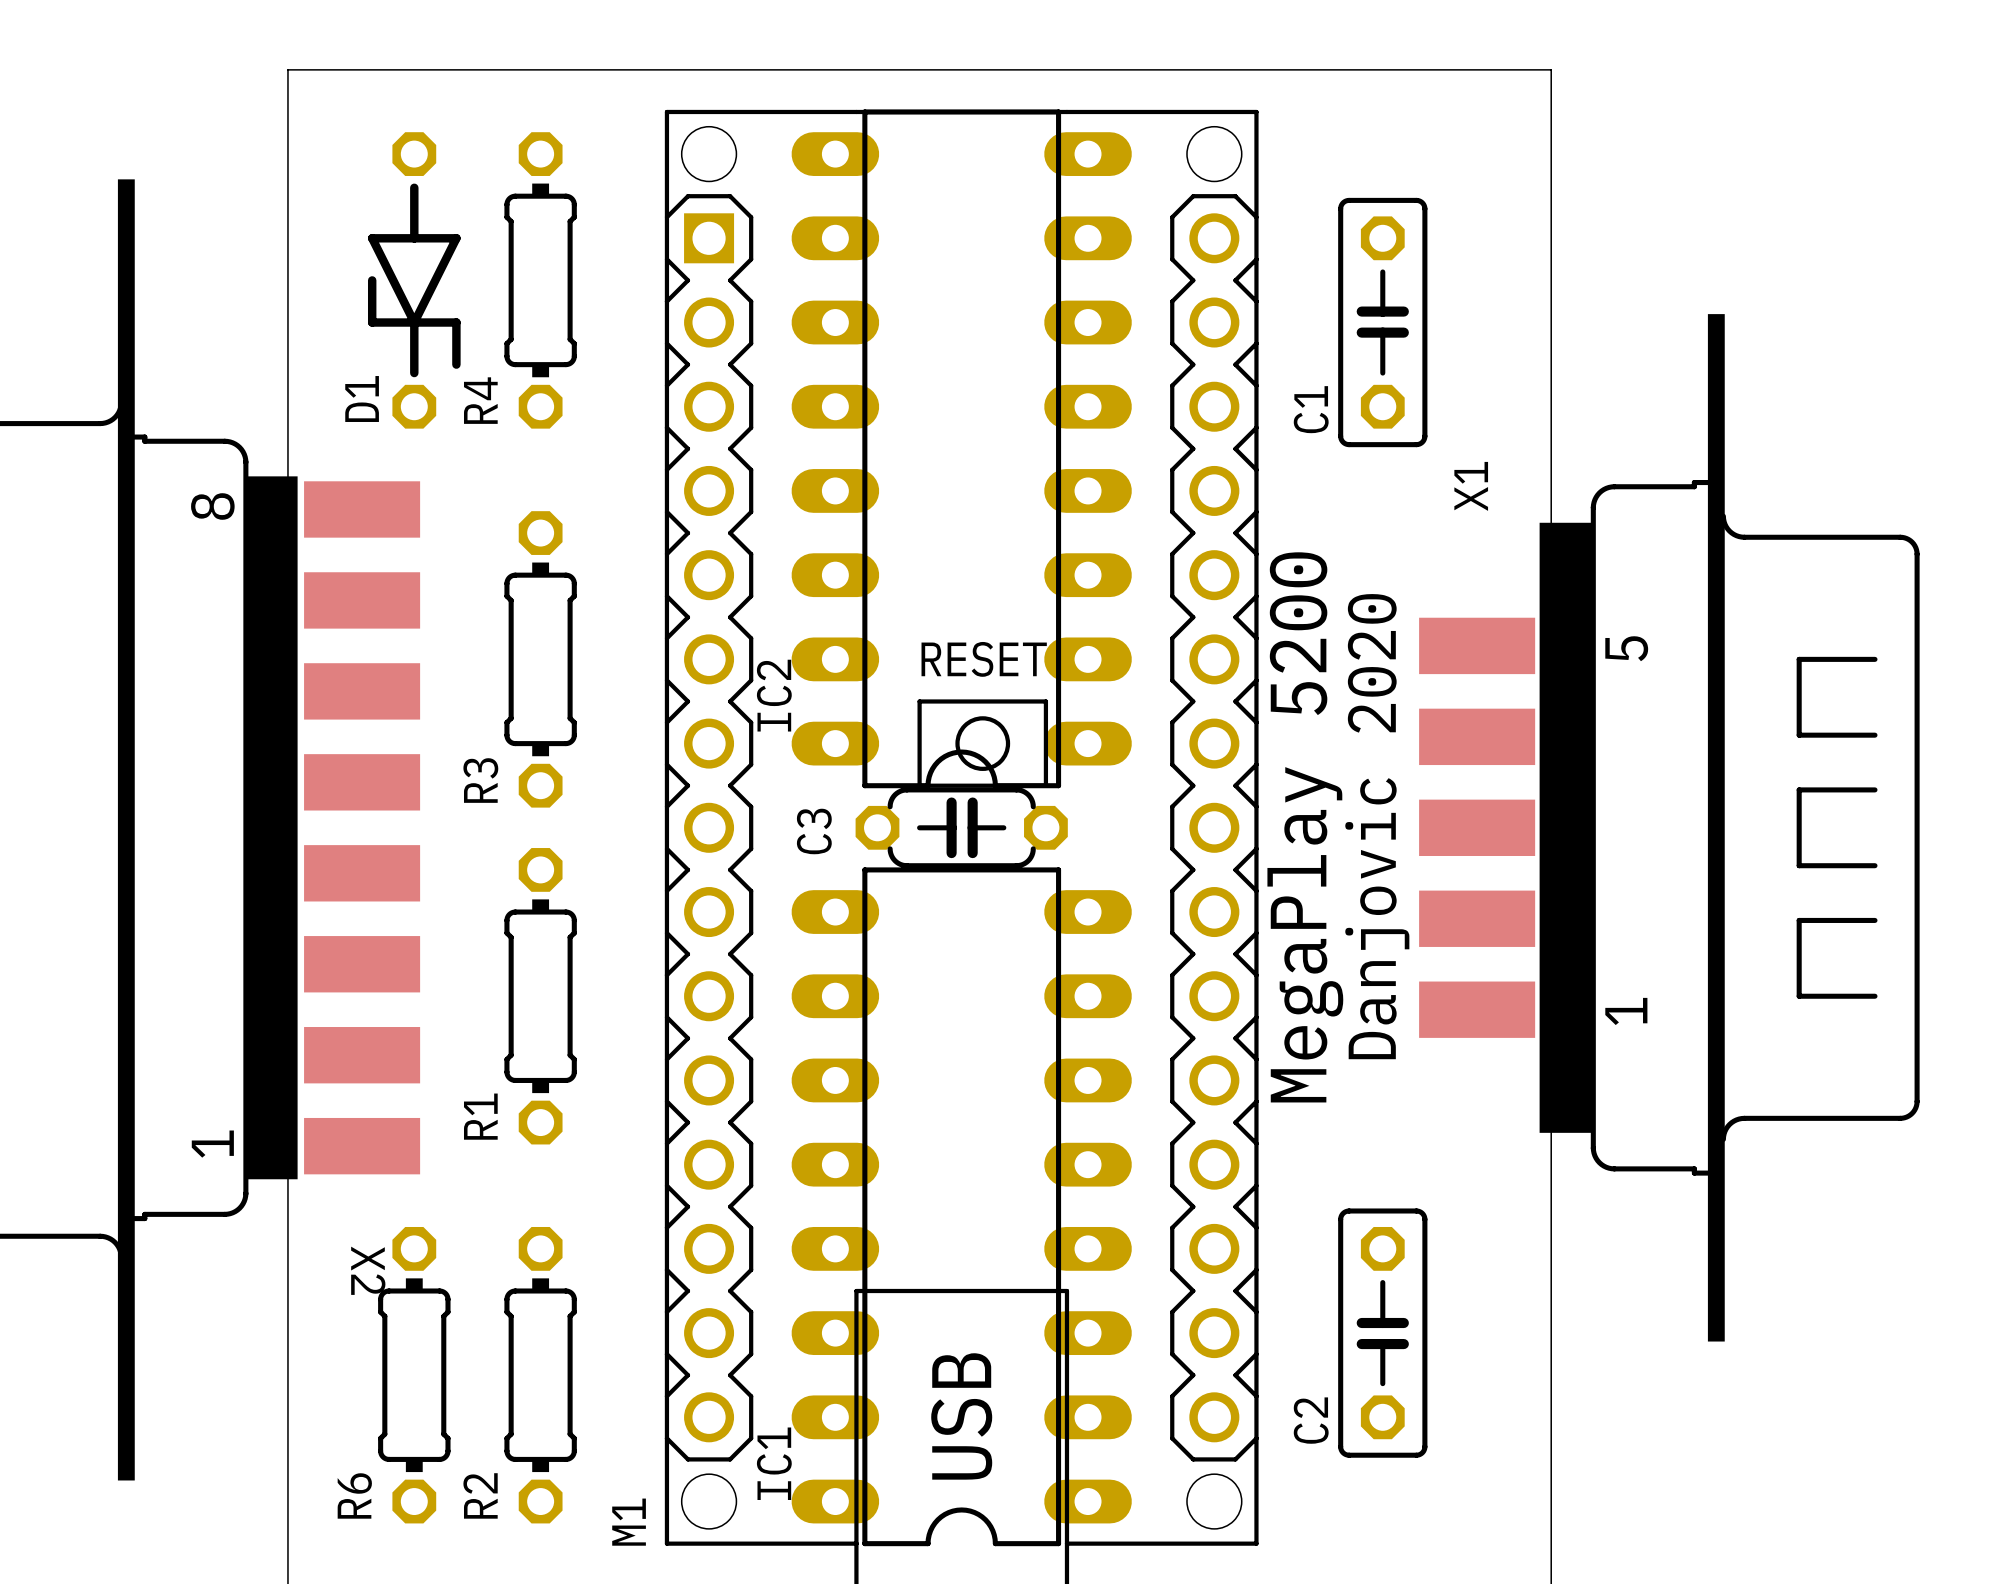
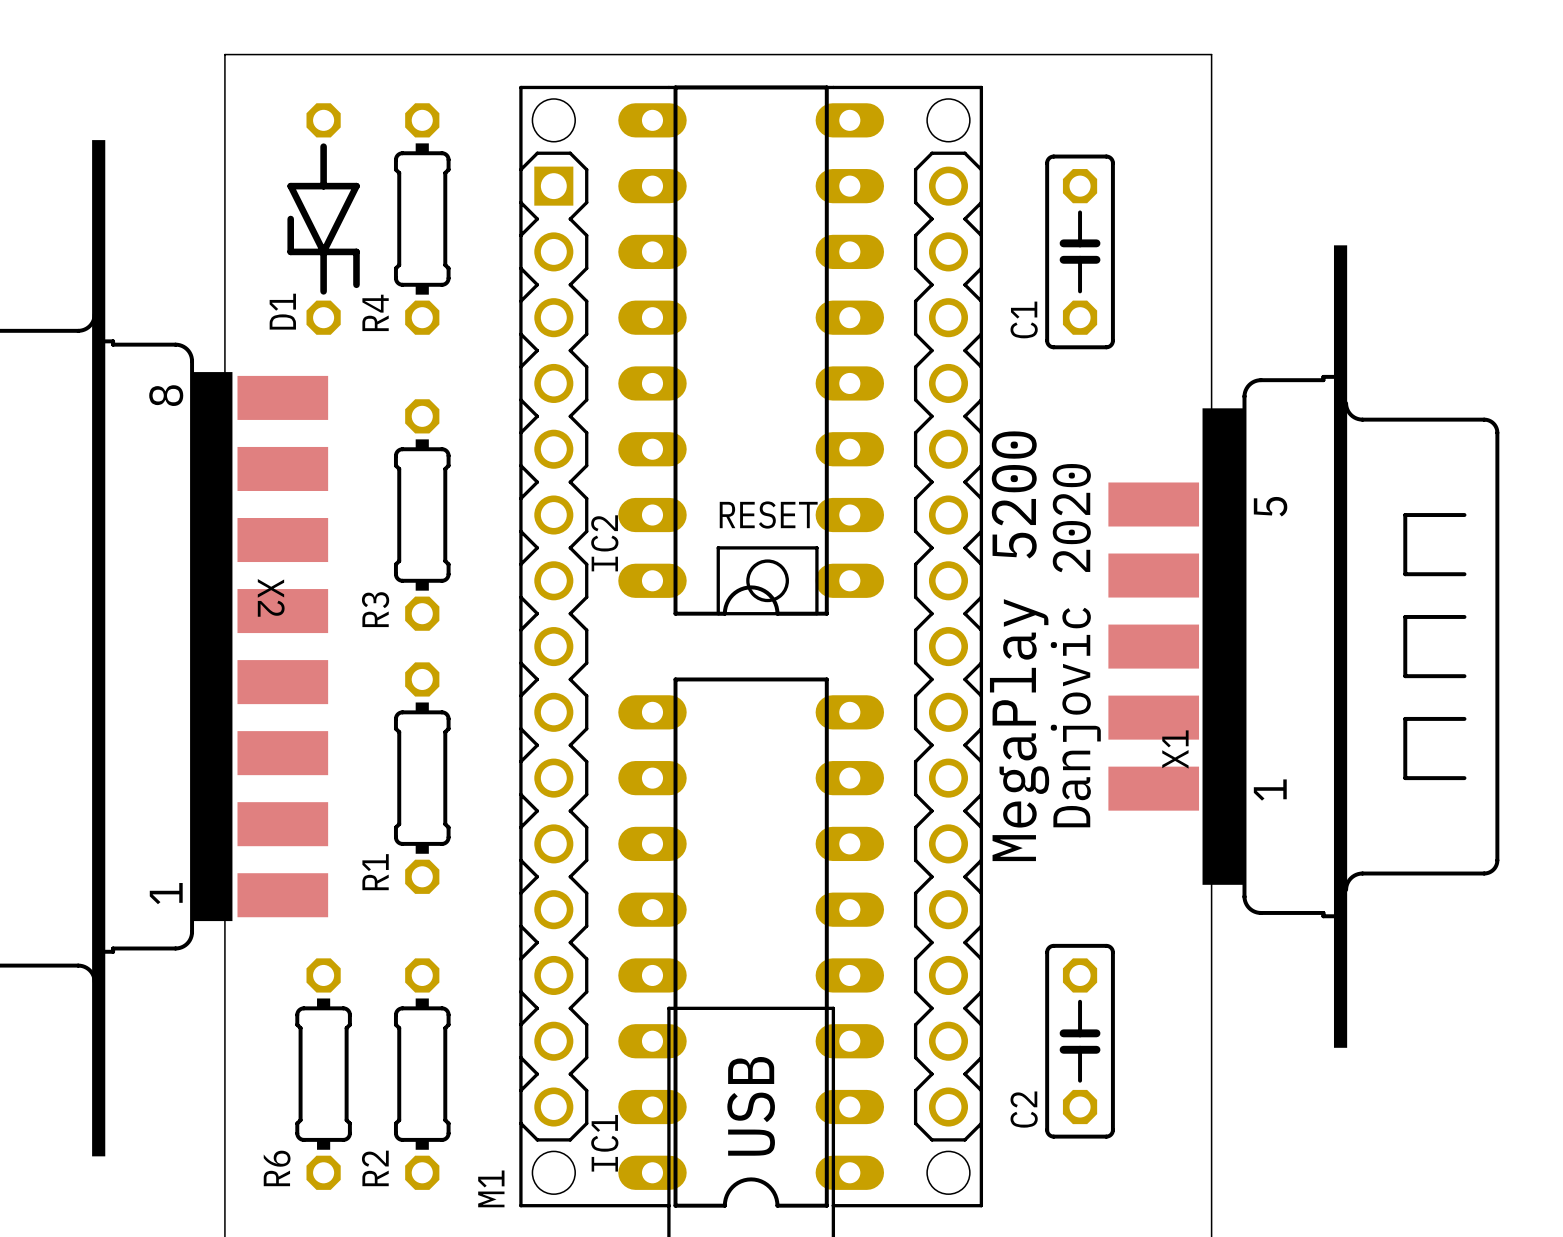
X1 name position: X1 (1471, 486) -> X1 (1175, 749)
C3: (961, 827) -> none
X2 name position: X2 (368, 1270) -> X2 (271, 597)

